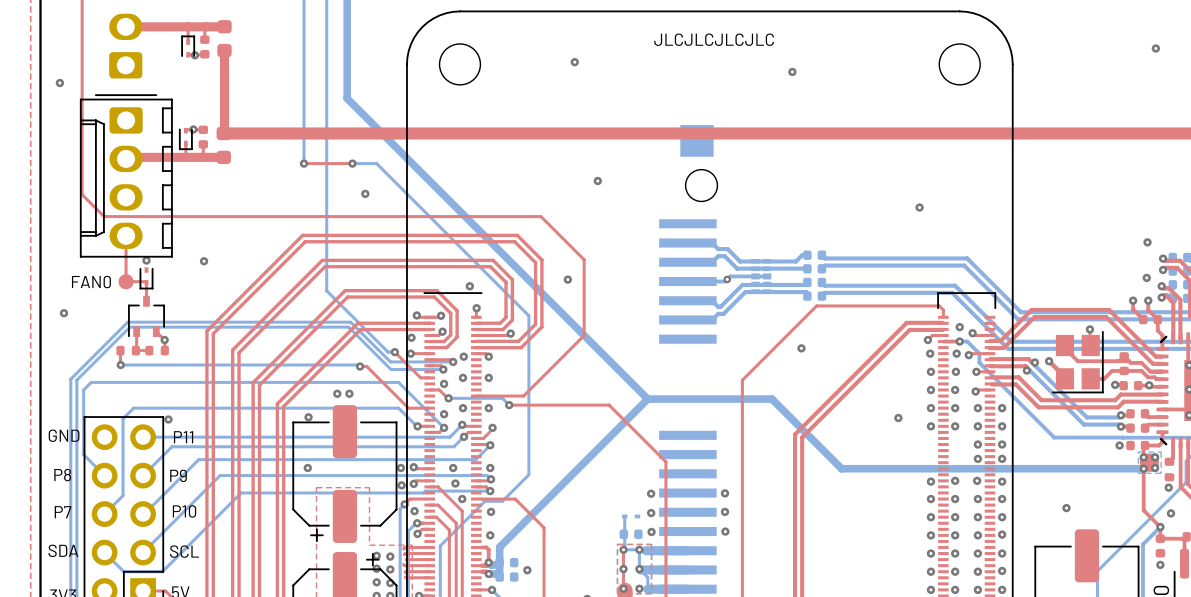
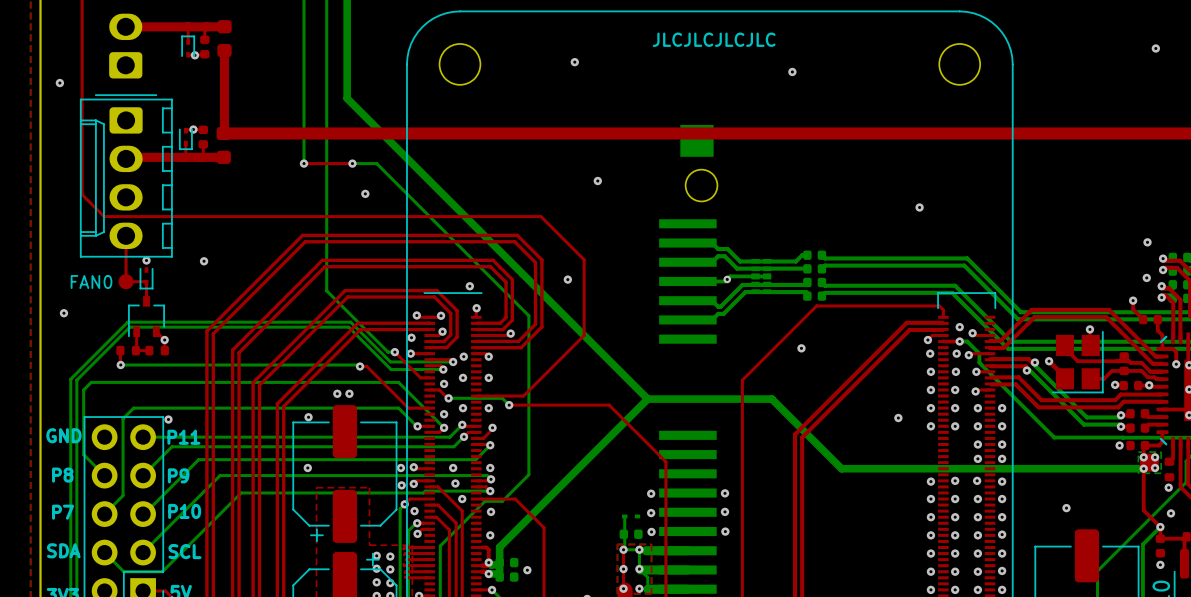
top track: (1148, 300) (1148, 310) (1157, 319) -> none
via position: (1148, 300) -> (1176, 364)
top track: none -> (1162, 348) (1173, 348) (1176, 352) (1176, 364)

